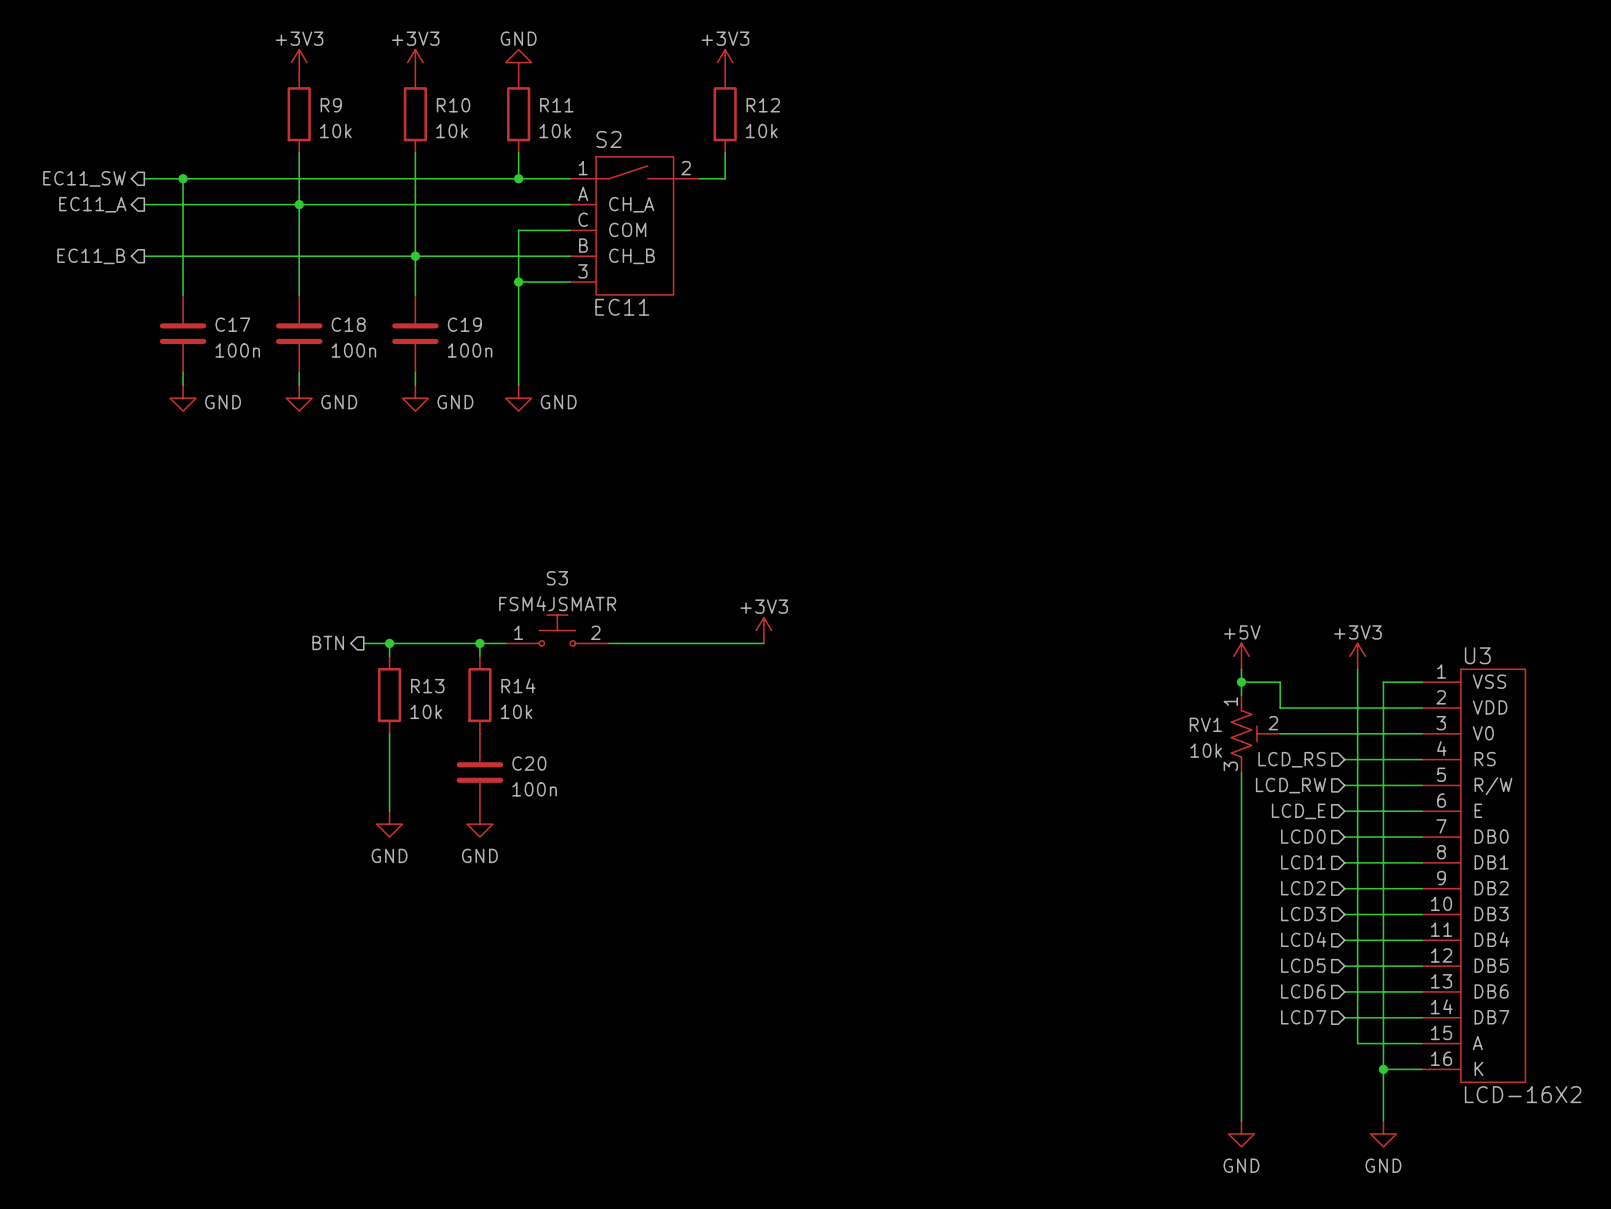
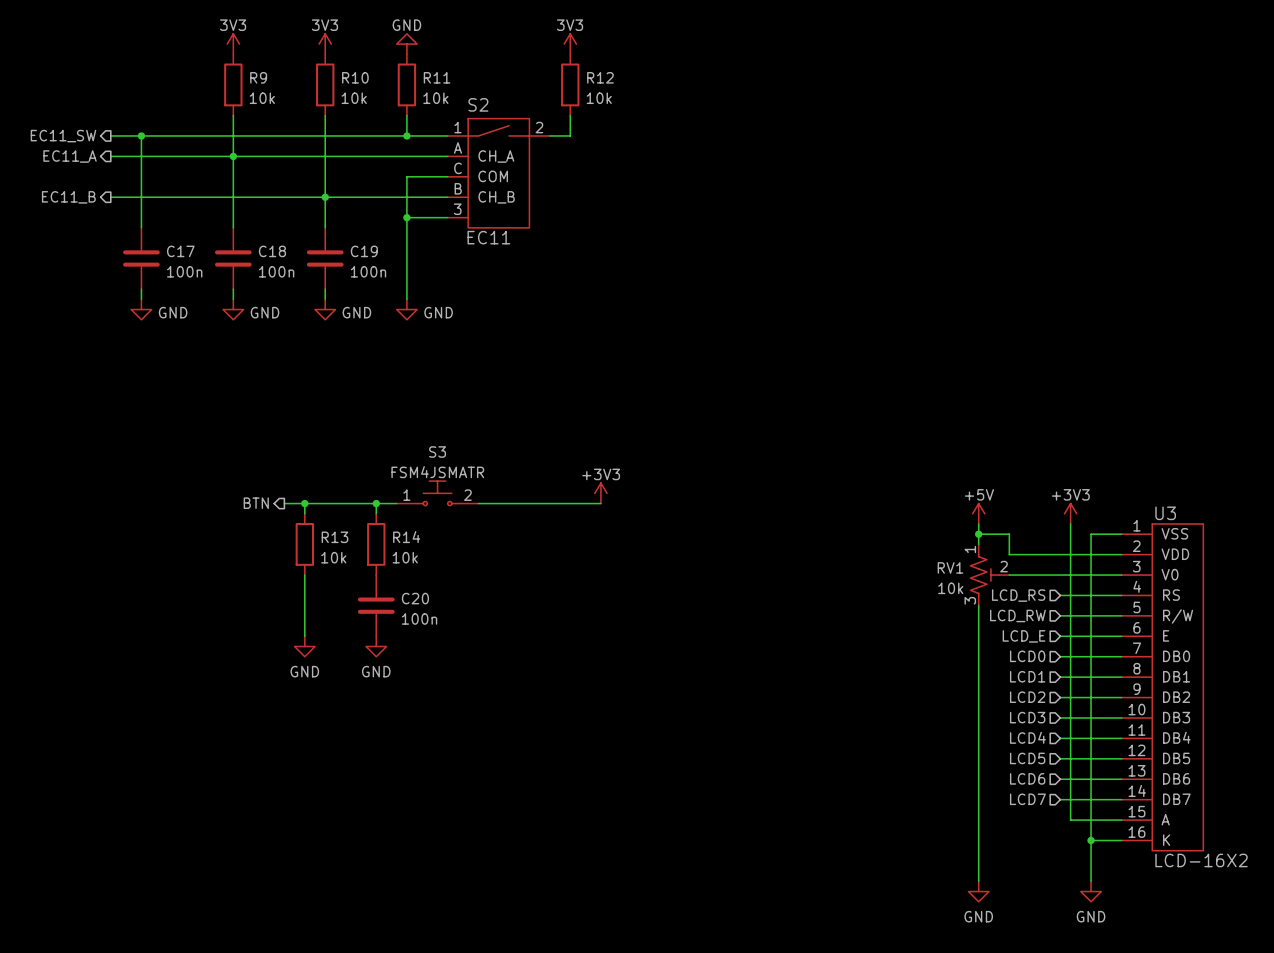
power symbol: +3V3 (299, 62) -> 3V3 (233, 44)
power symbol: +3V3 (415, 62) -> 3V3 (325, 44)
power symbol: +3V3 (725, 62) -> 3V3 (570, 44)

